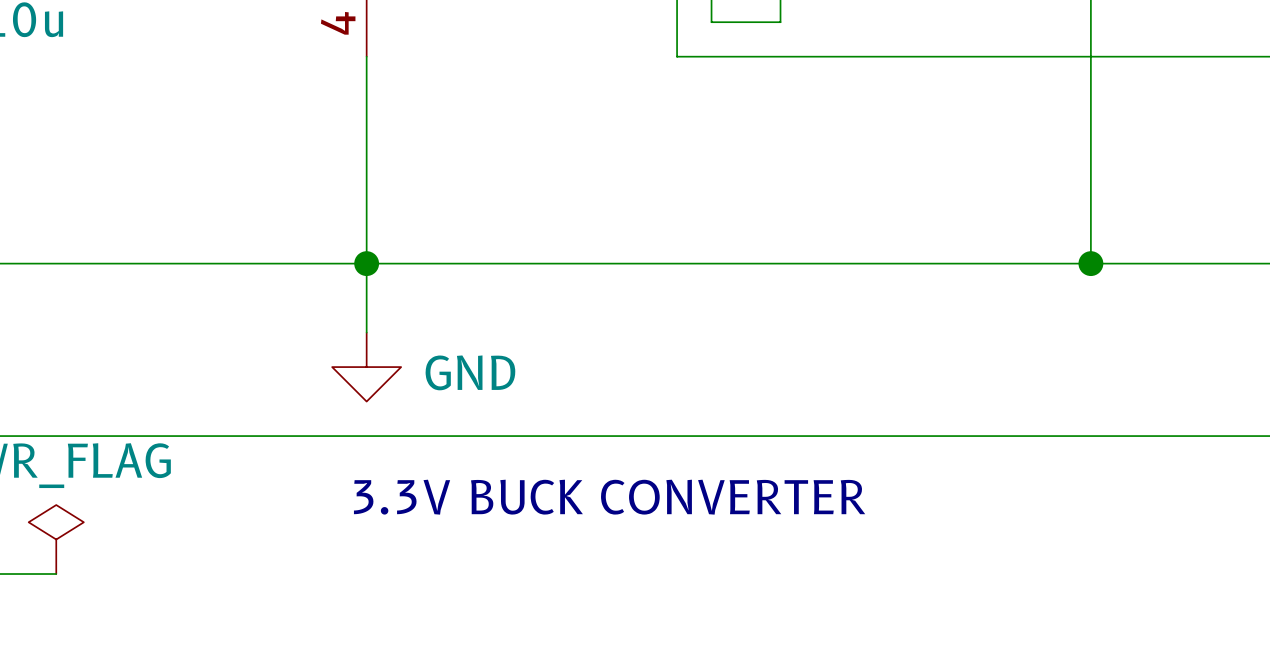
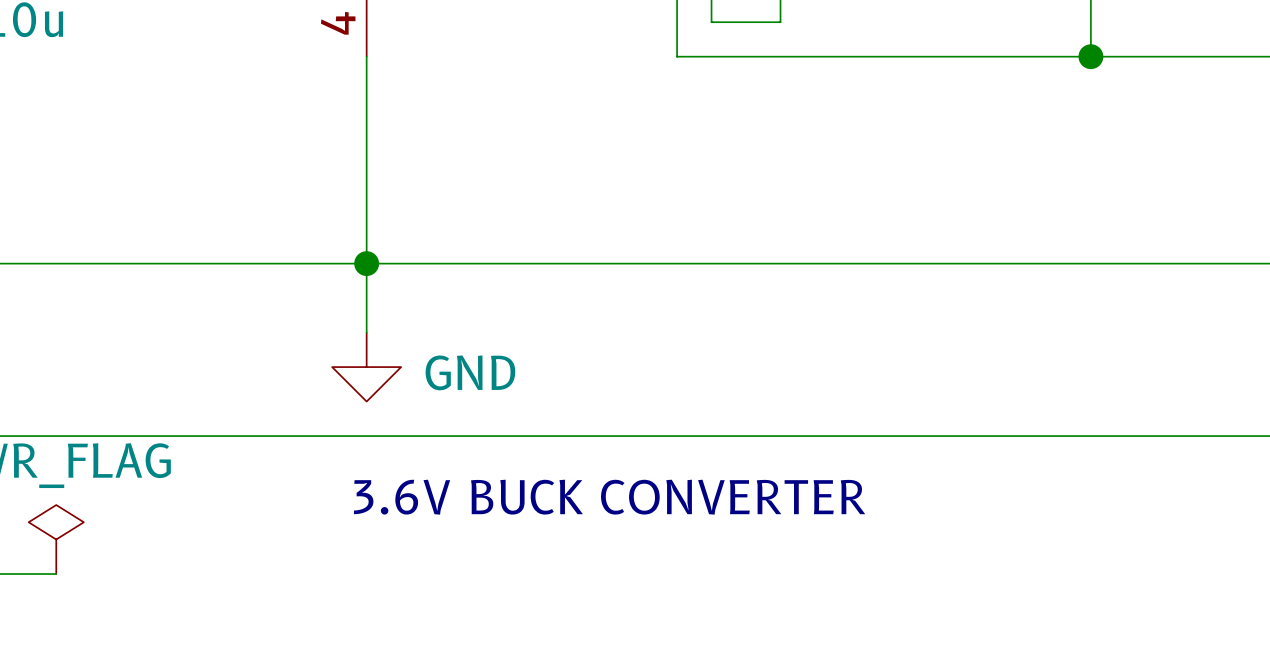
wire: (1090, 56) (1090, 263) -> none
junction: none -> (1090, 56)
junction: (1090, 263) -> none
text: 3.3V BUCK CONVERTER (609, 497) -> 3.6V BUCK CONVERTER (609, 497)

